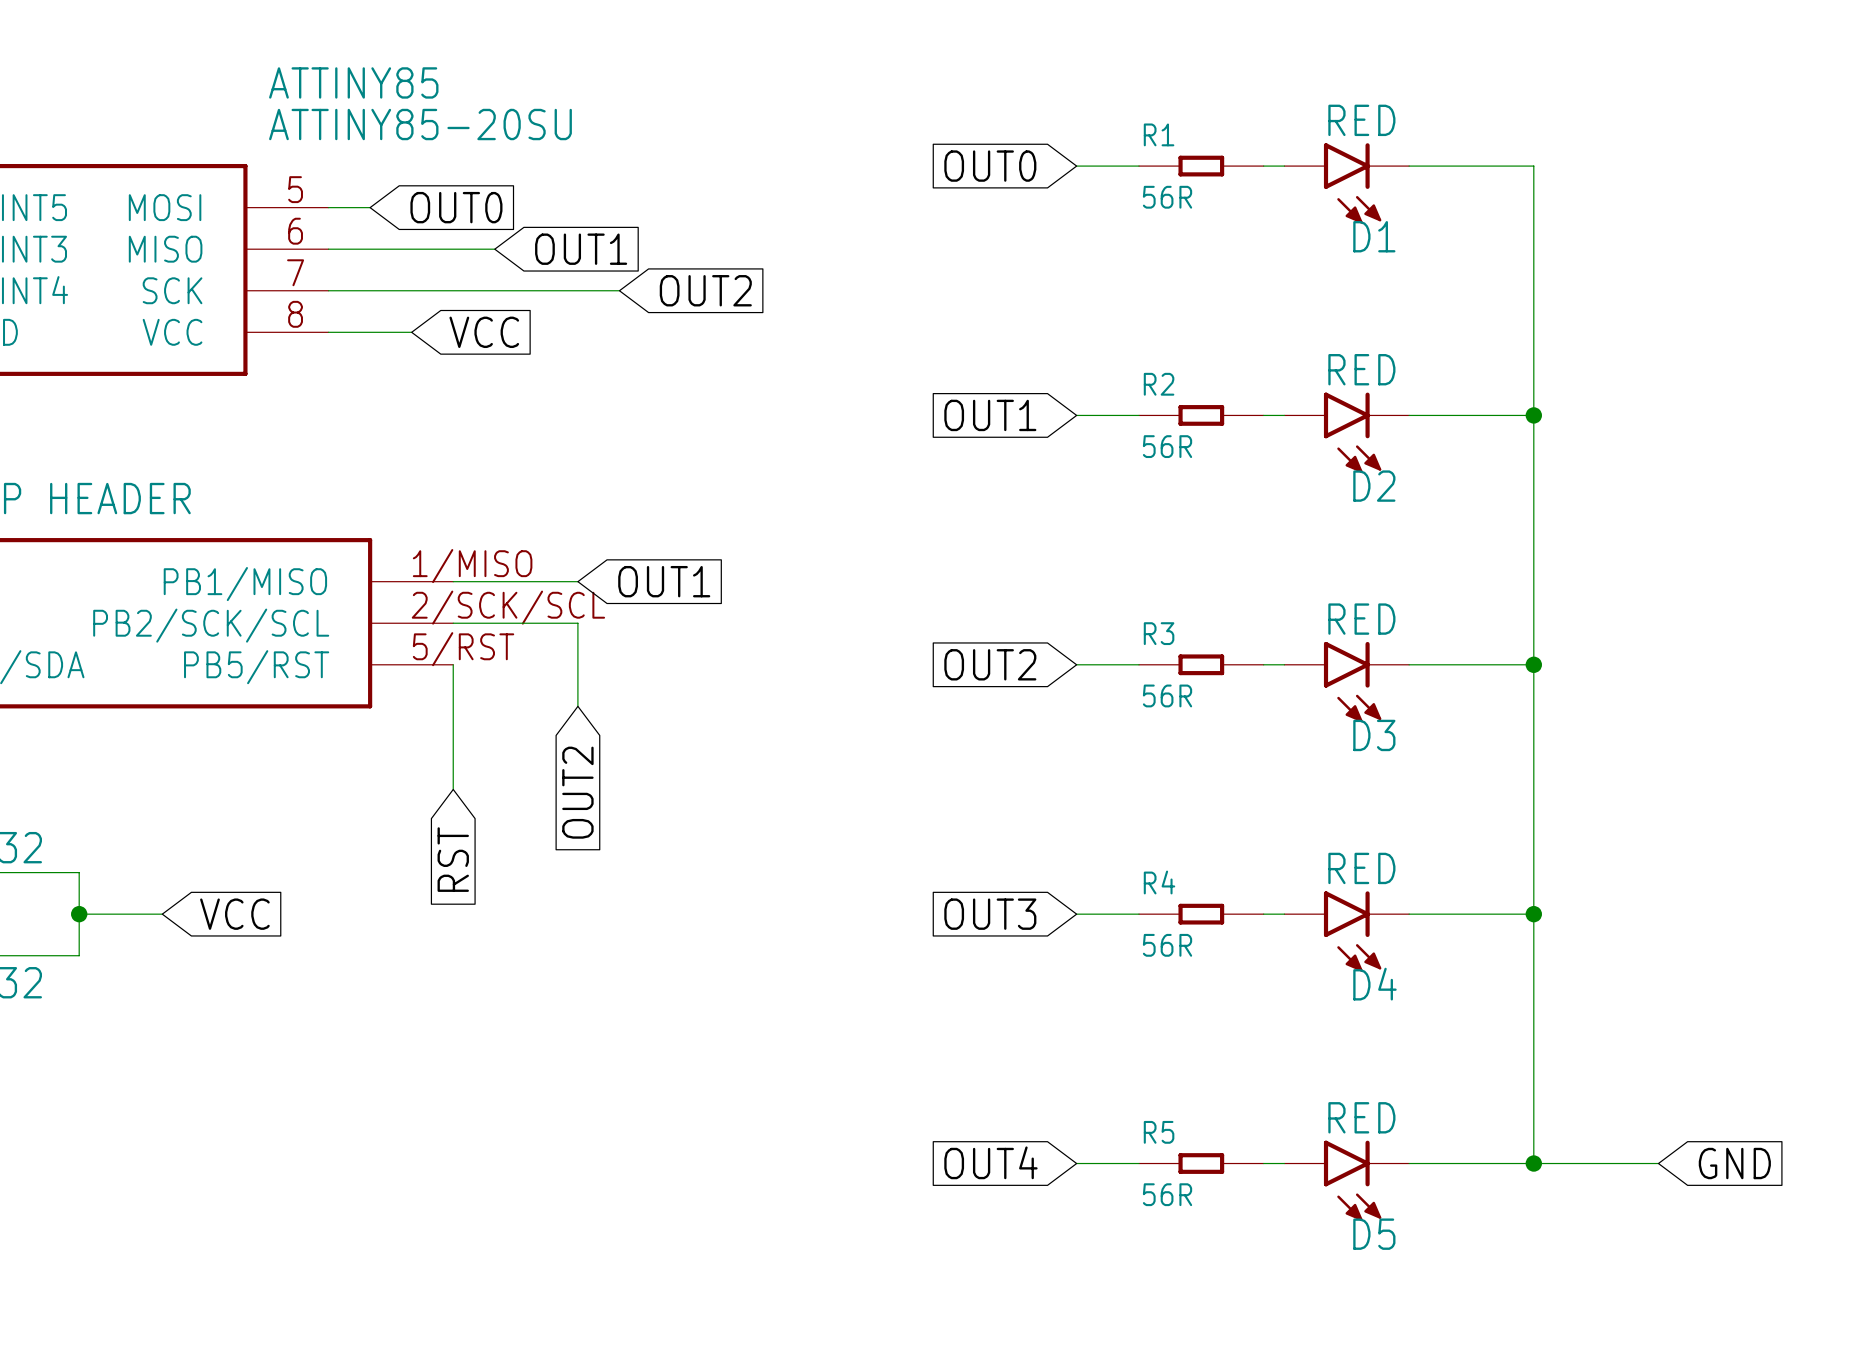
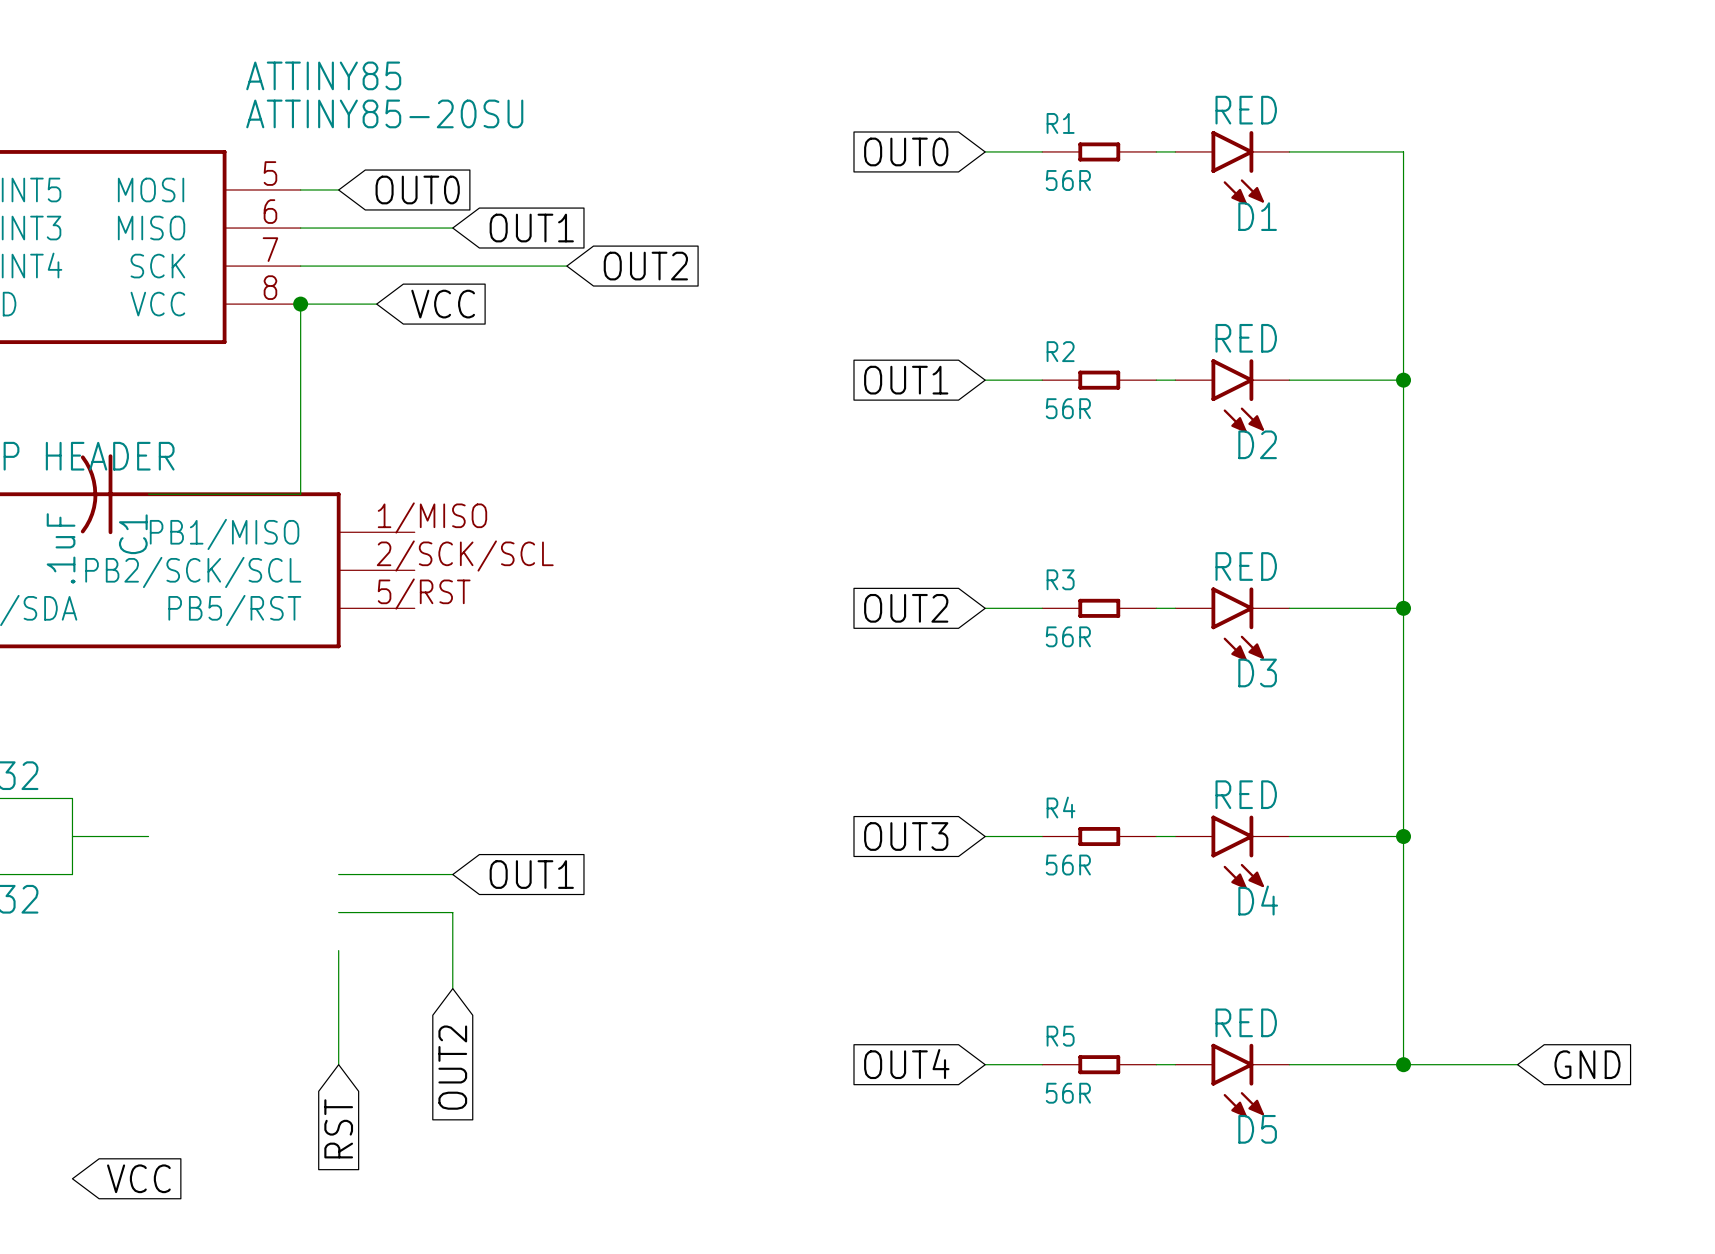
wire: none -> (300, 304) (300, 494) (148, 494)
junction: none -> (300, 304)
C1: none -> .1uF (91, 494)
wire: (453, 581) (577, 581) -> (338, 874) (452, 874)
global label position: OUT1 (664, 581) -> OUT1 (531, 874)
wire: (453, 623) (577, 623) (577, 706) -> (338, 912) (452, 912) (452, 988)
wire: (453, 664) (453, 789) -> (338, 950) (338, 1064)
global label position: OUT2 (577, 792) -> OUT2 (452, 1067)
global label position: RST (453, 859) -> RST (338, 1128)
junction: (79, 914) -> none
global label position: VCC (234, 914) -> VCC (138, 1178)

